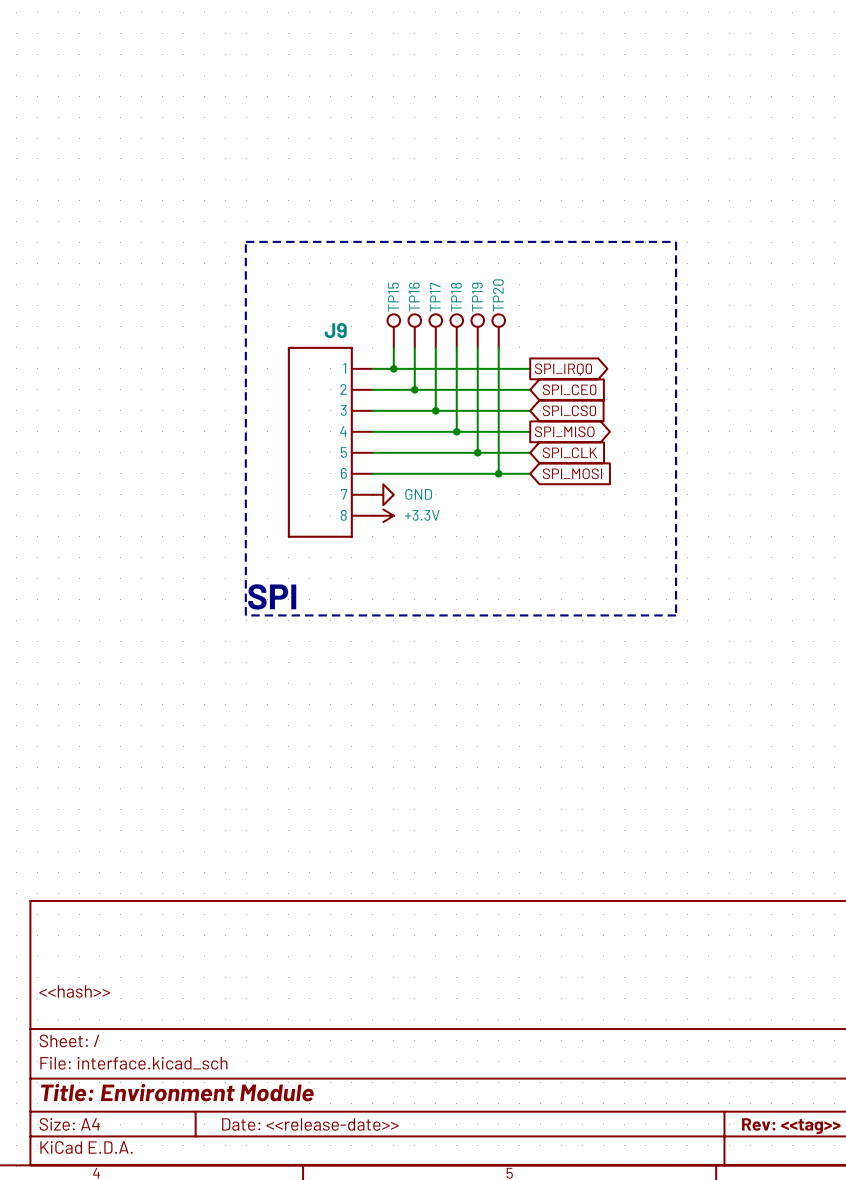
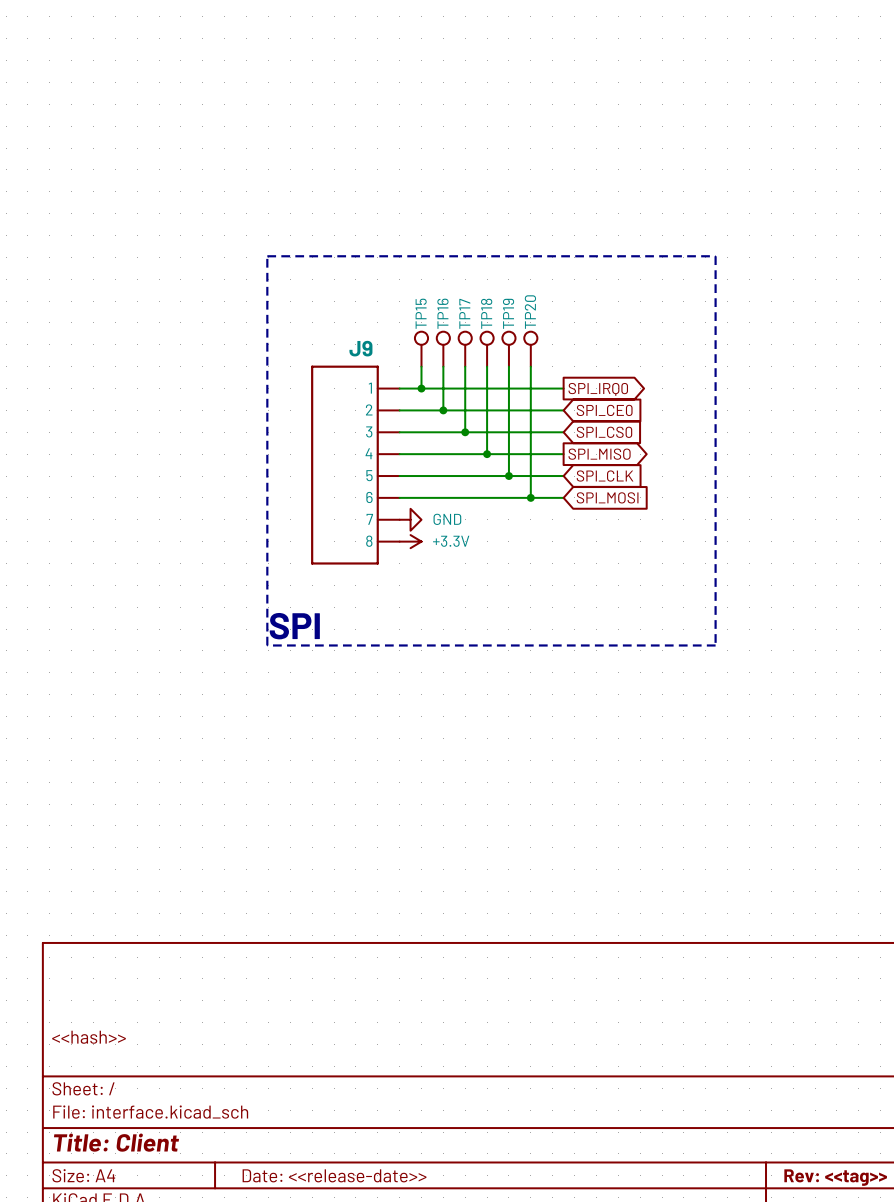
title block: Title: Environment Module (177, 1092) -> Title: Client (116, 1142)

